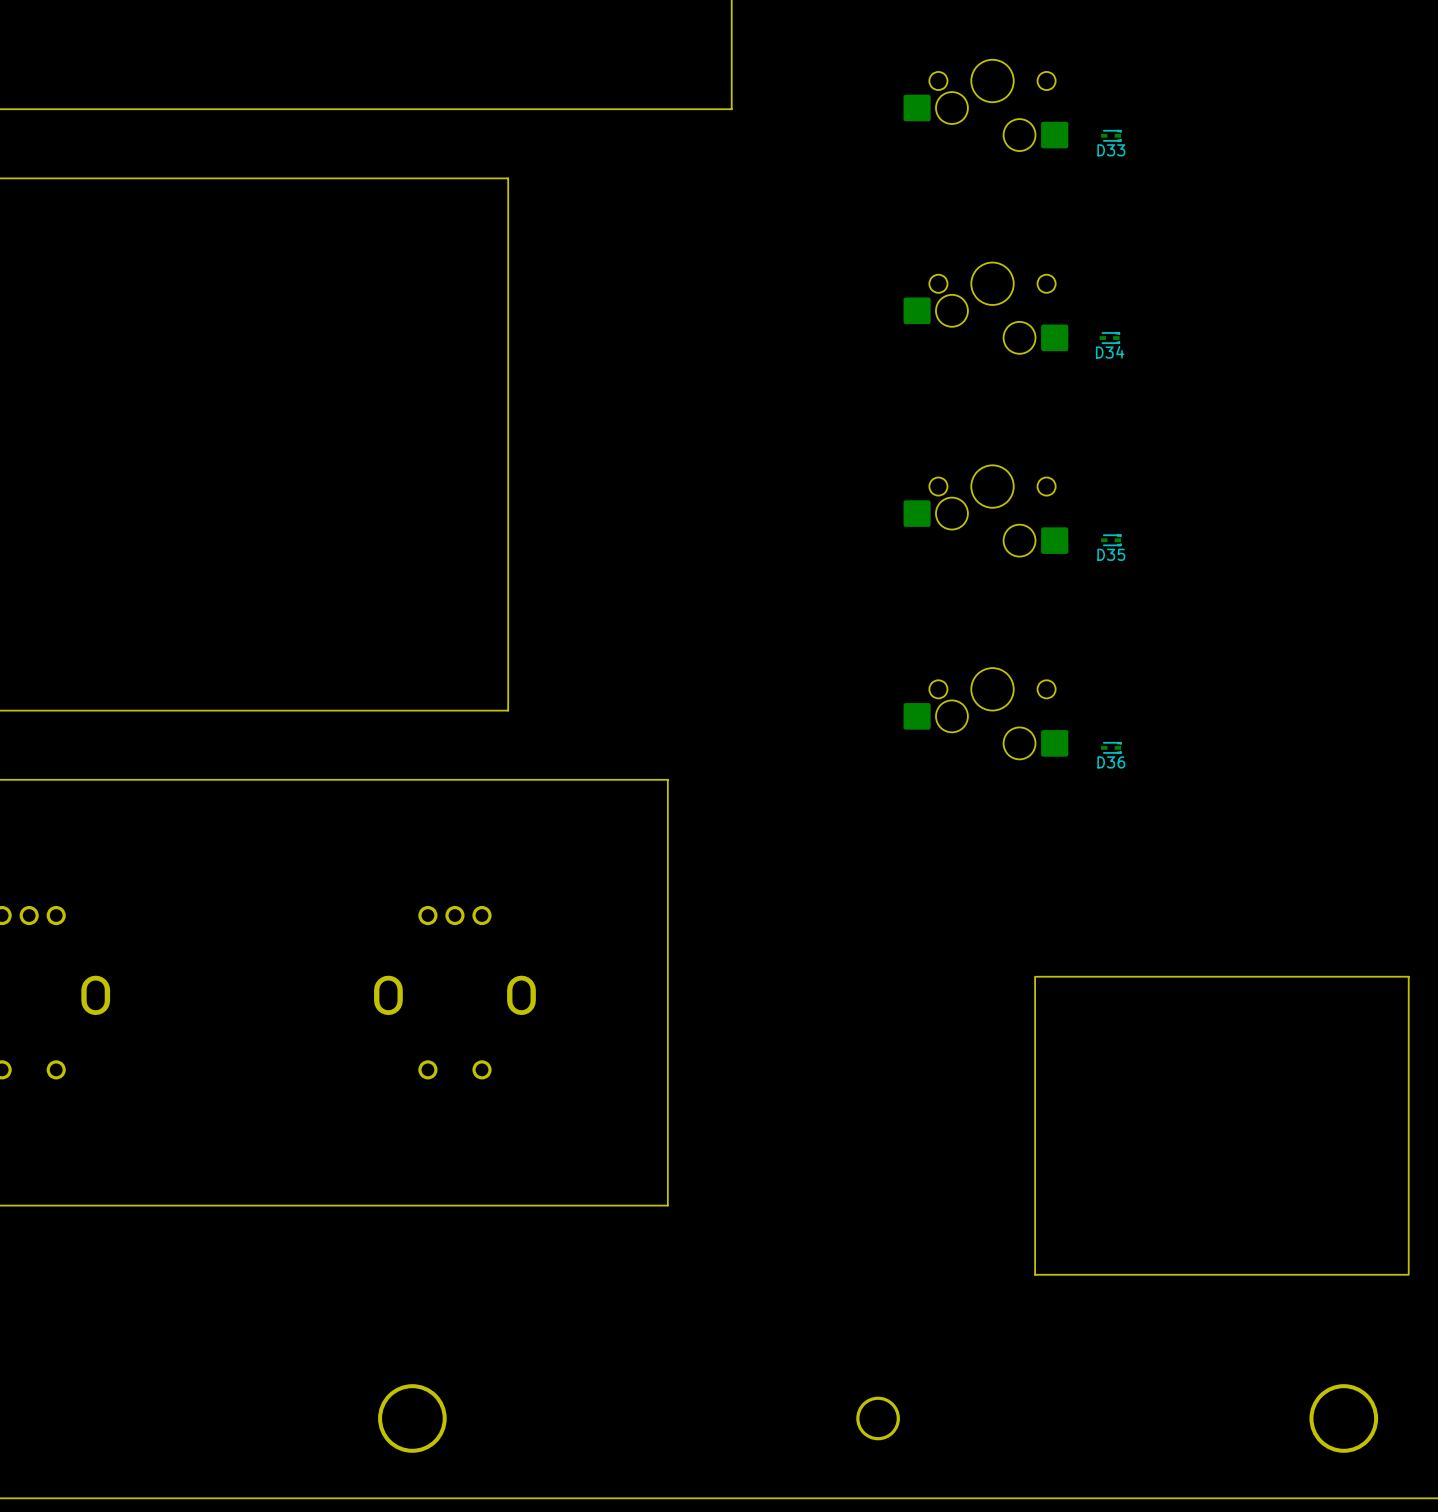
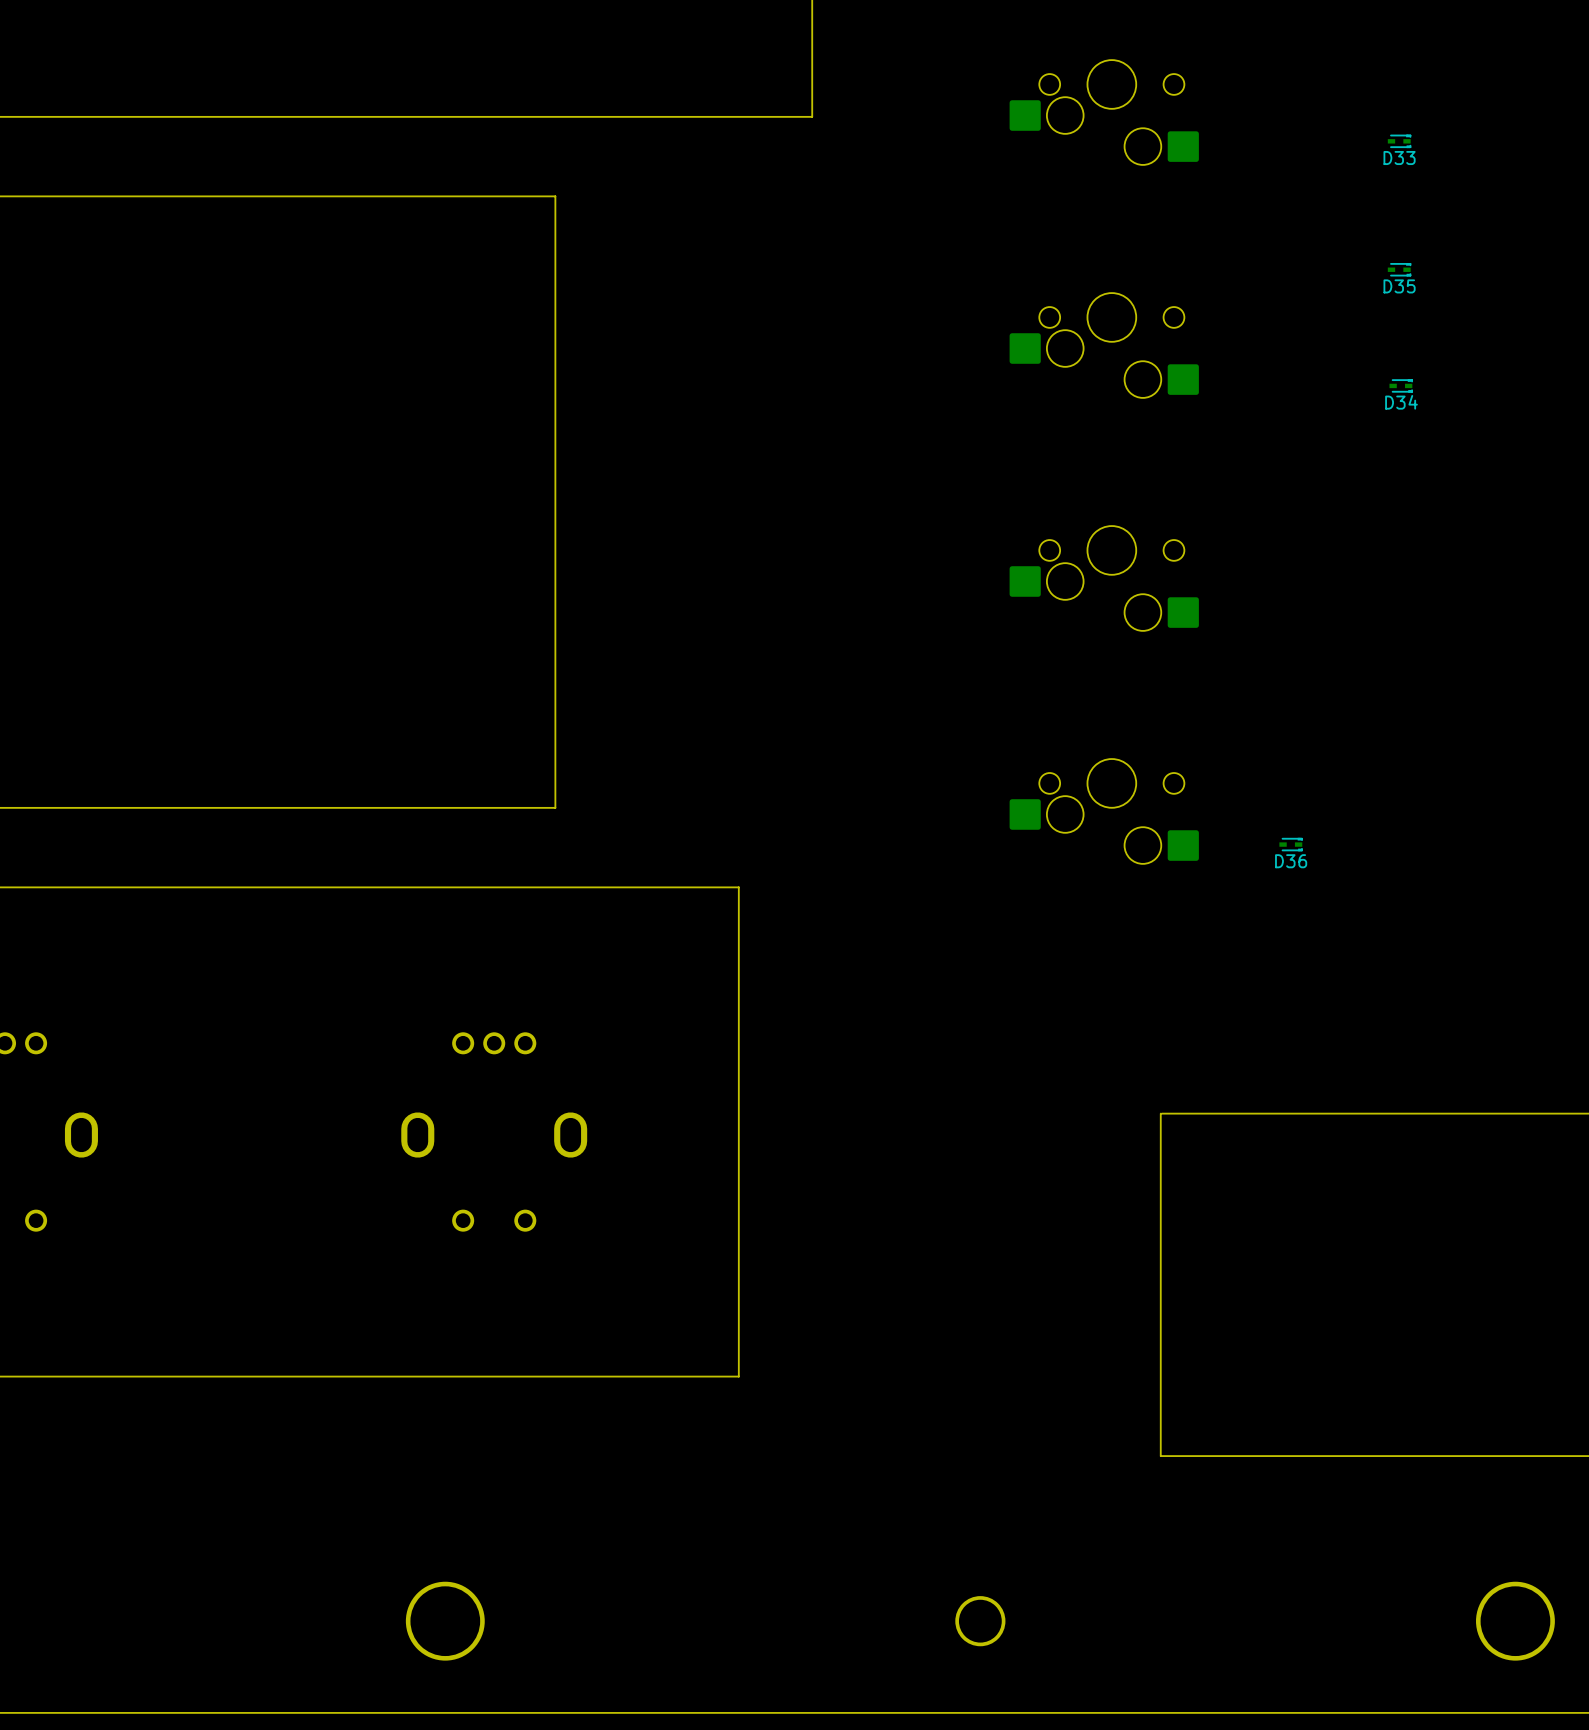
D33 position: (1111, 135) -> (1399, 141)
D34 position: (1109, 338) -> (1401, 385)
D35 position: (1111, 540) -> (1399, 269)
D36 position: (1111, 747) -> (1291, 844)

